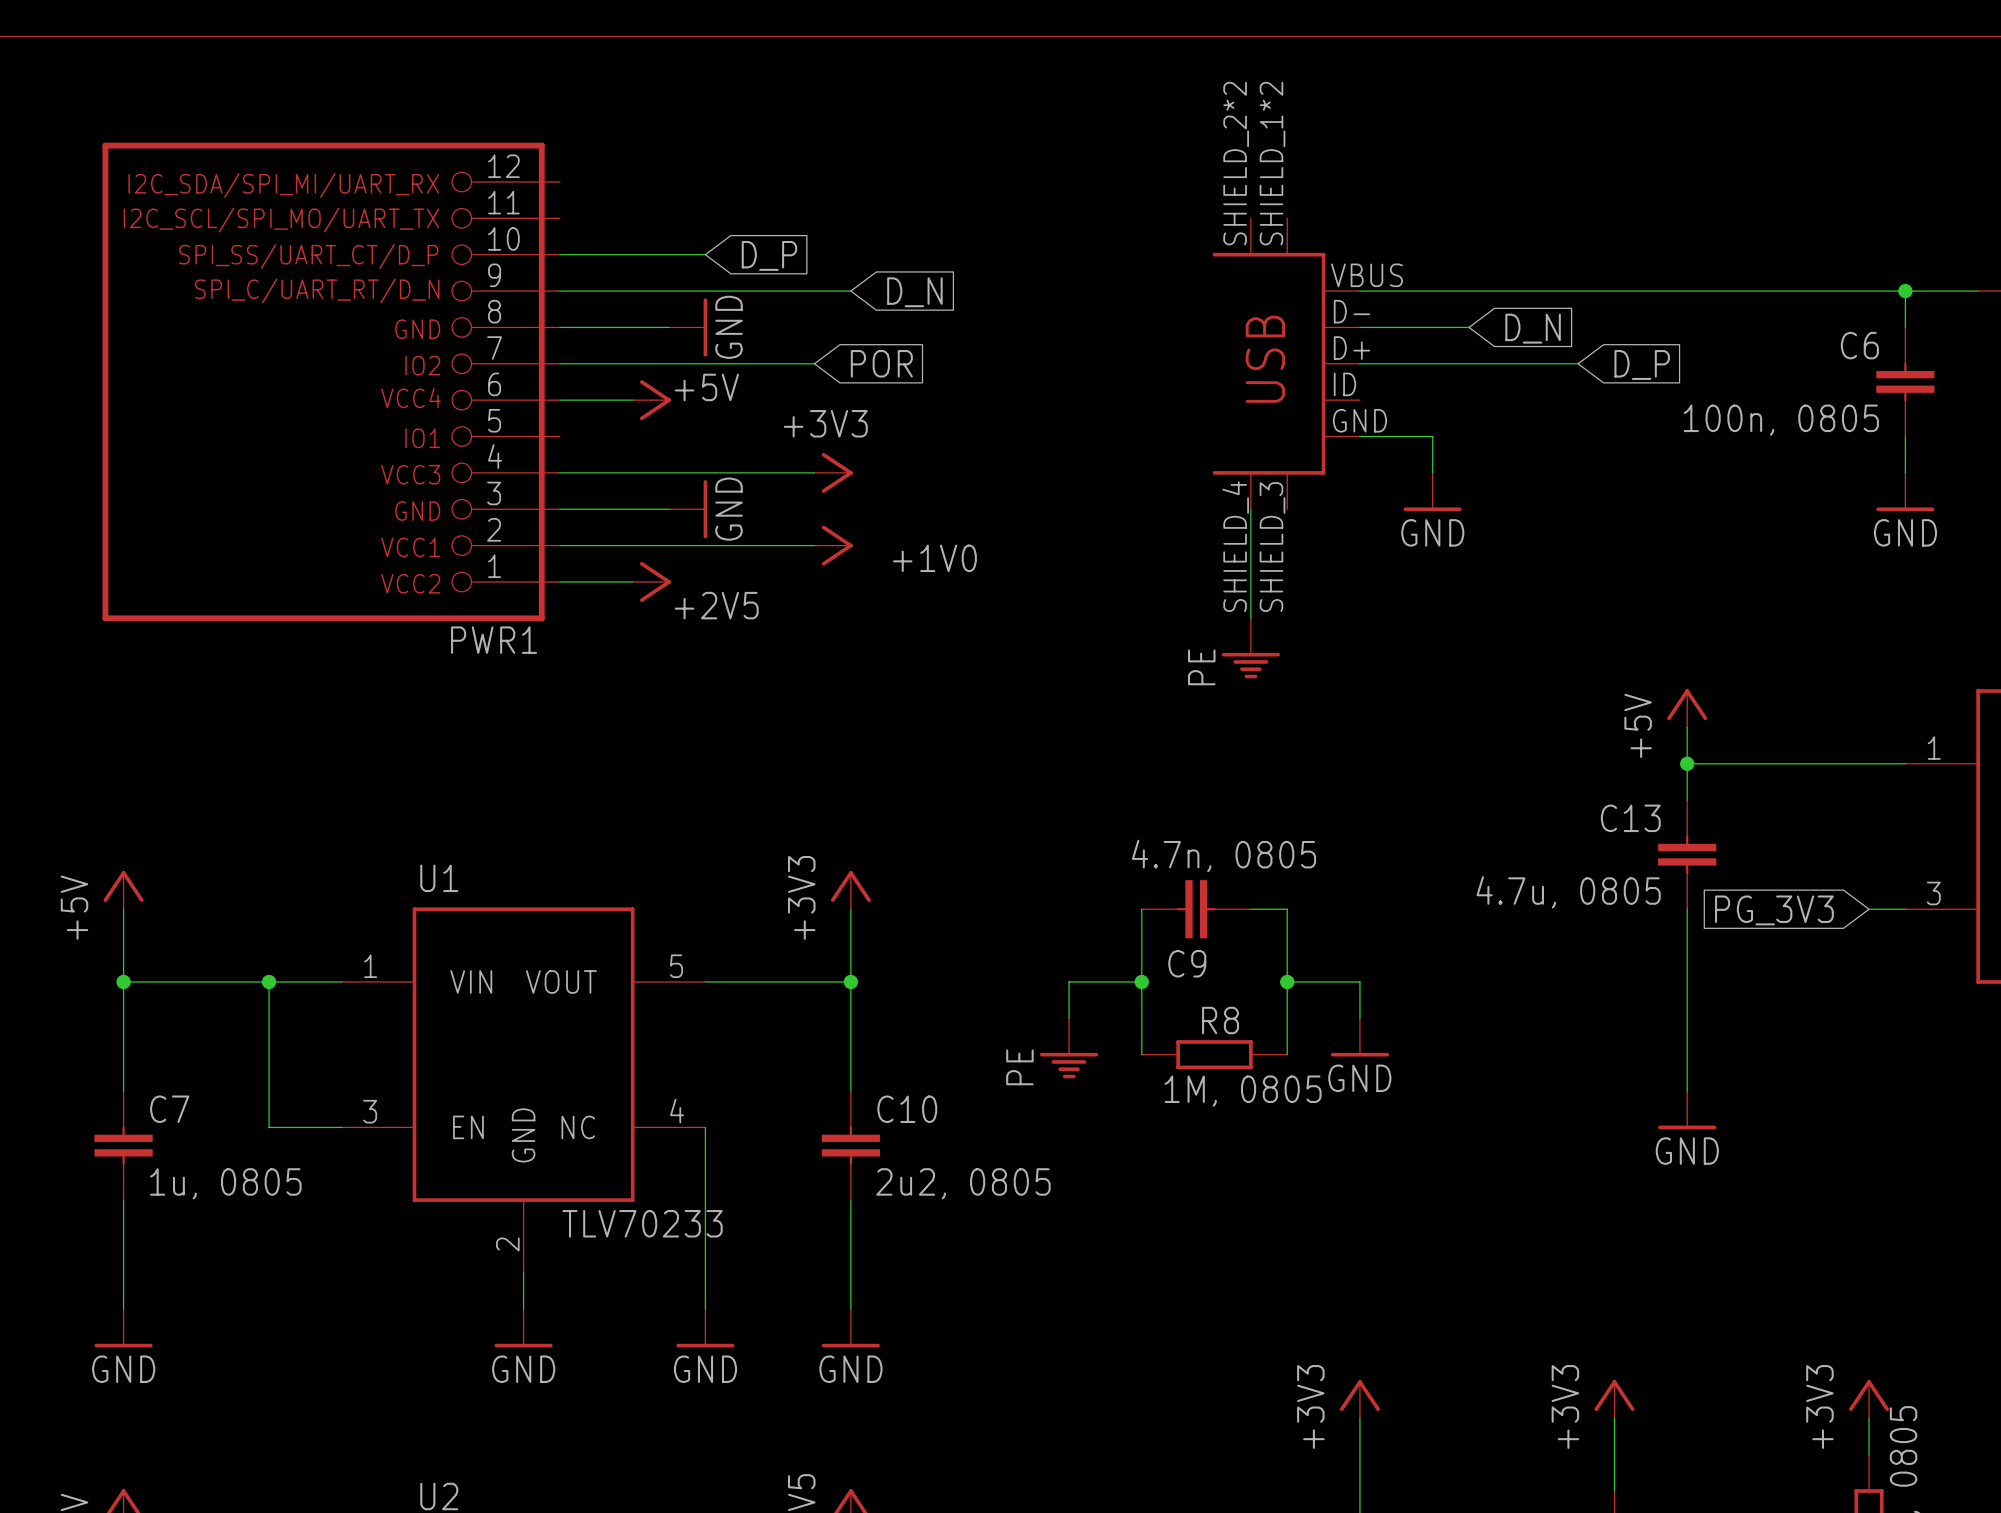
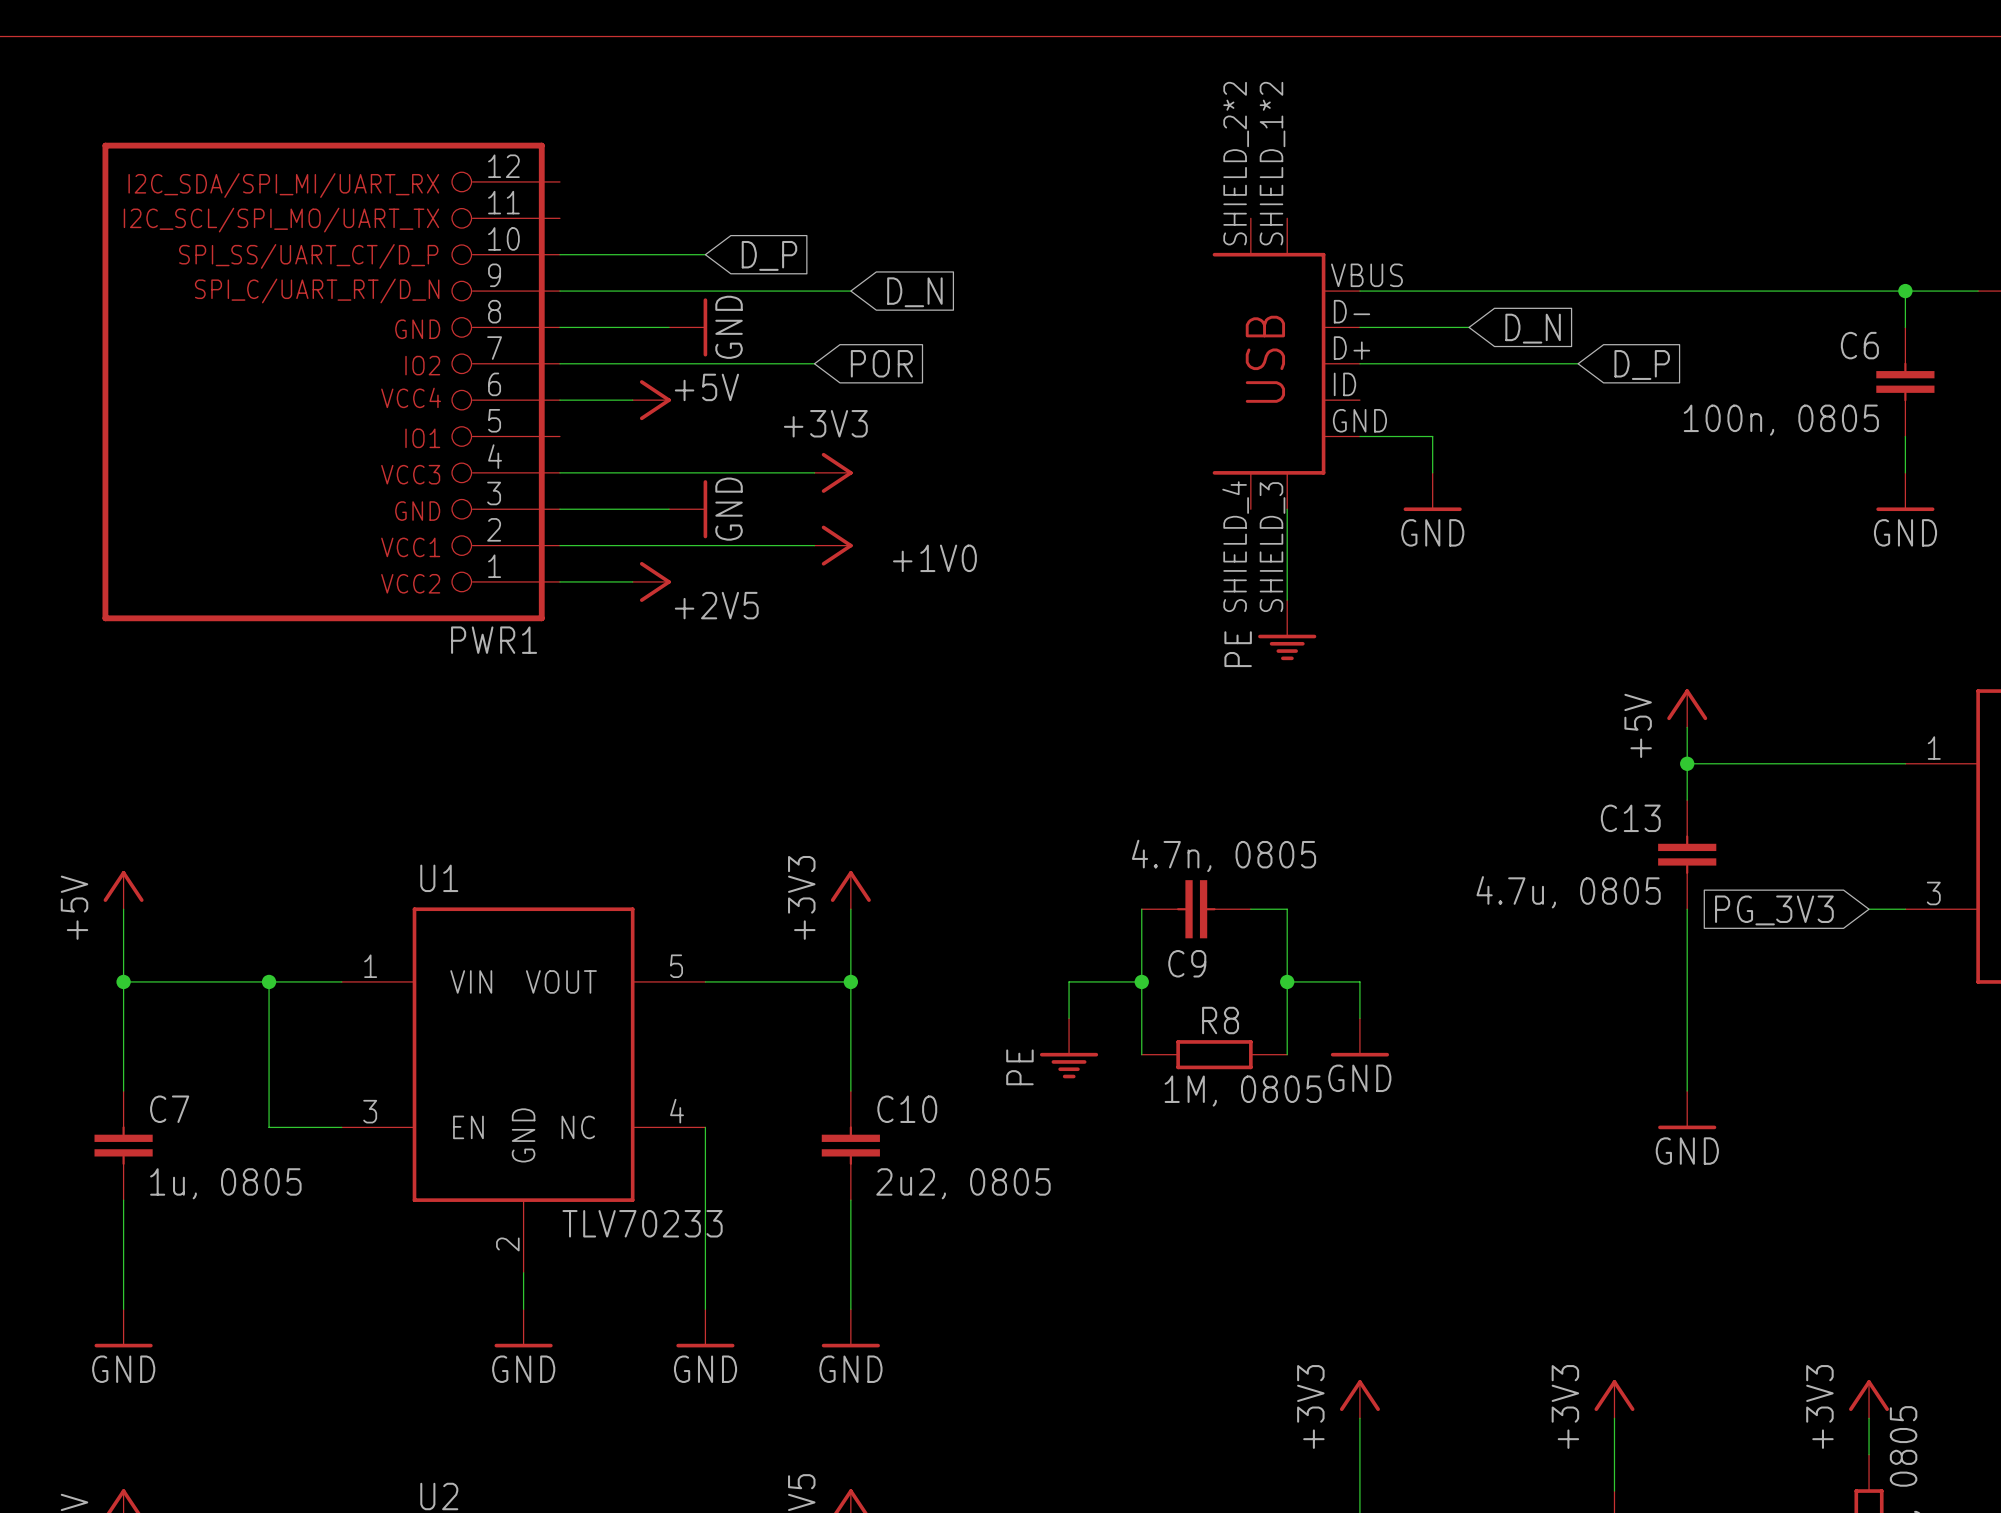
wire: (1250, 509) (1250, 618) -> none
wire: none -> (1287, 509) (1287, 600)
power symbol position: PE (1250, 648) -> PE (1287, 630)

